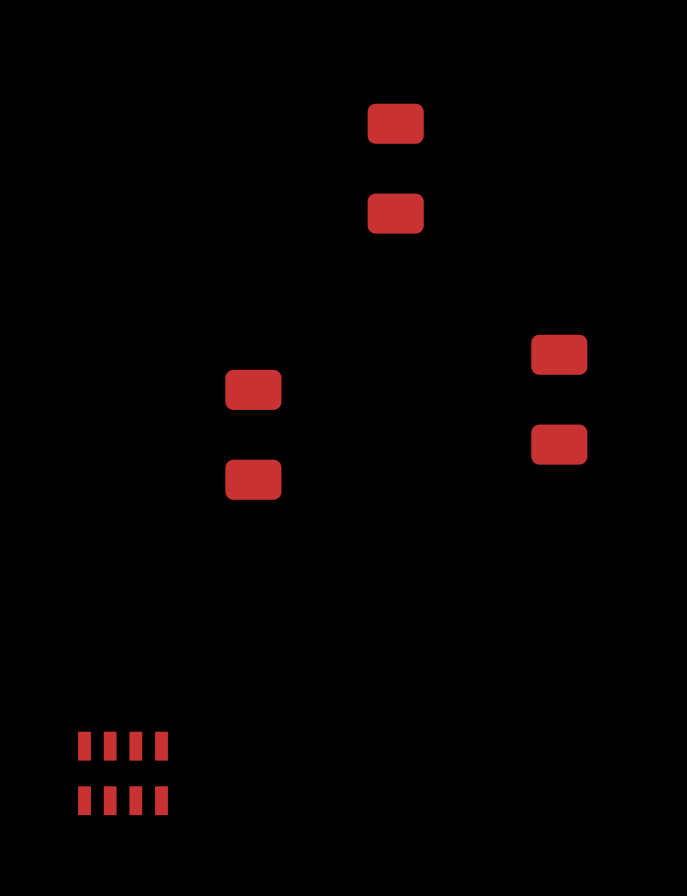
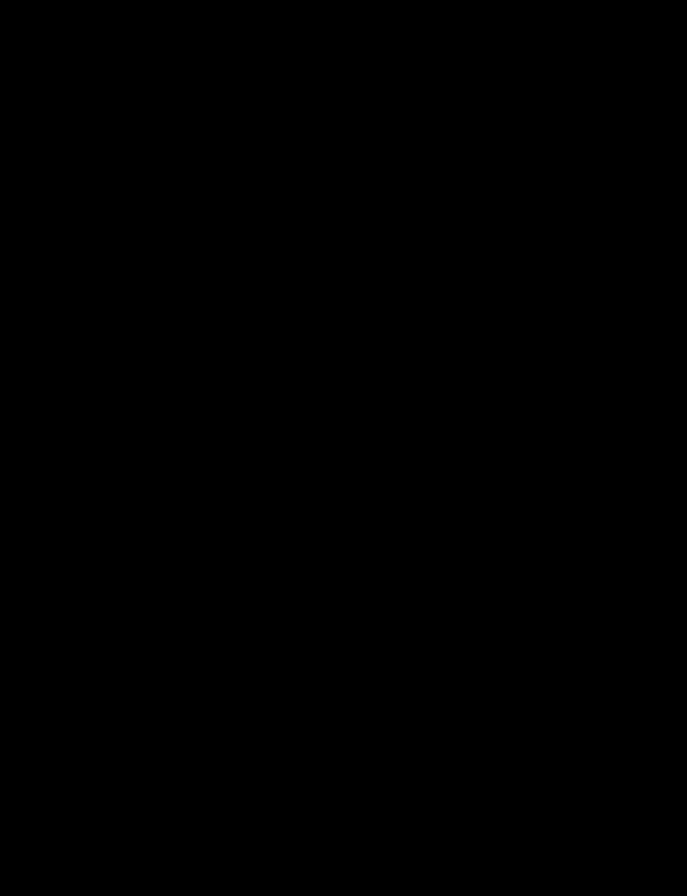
part: (395, 168) -> none
part: (559, 399) -> none
part: (253, 434) -> none
part: (122, 773) -> none

